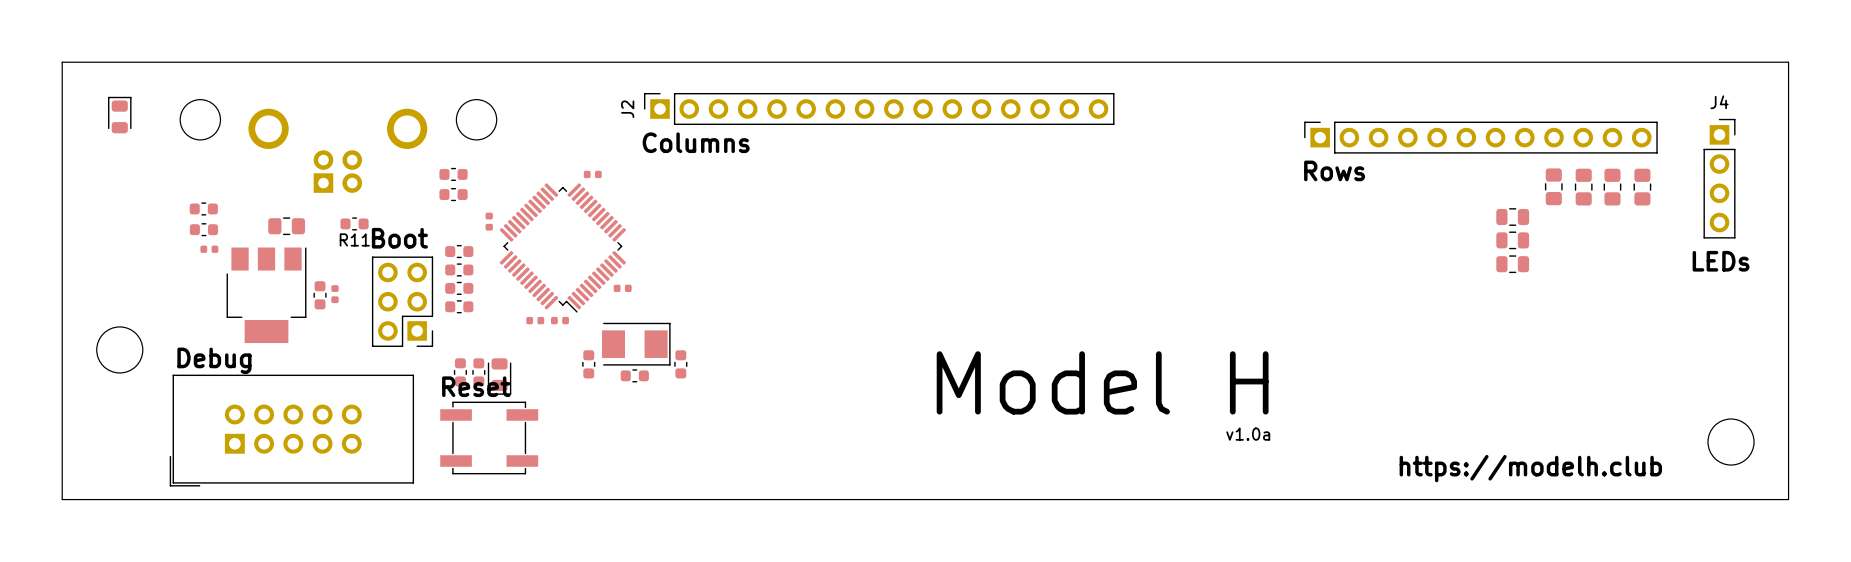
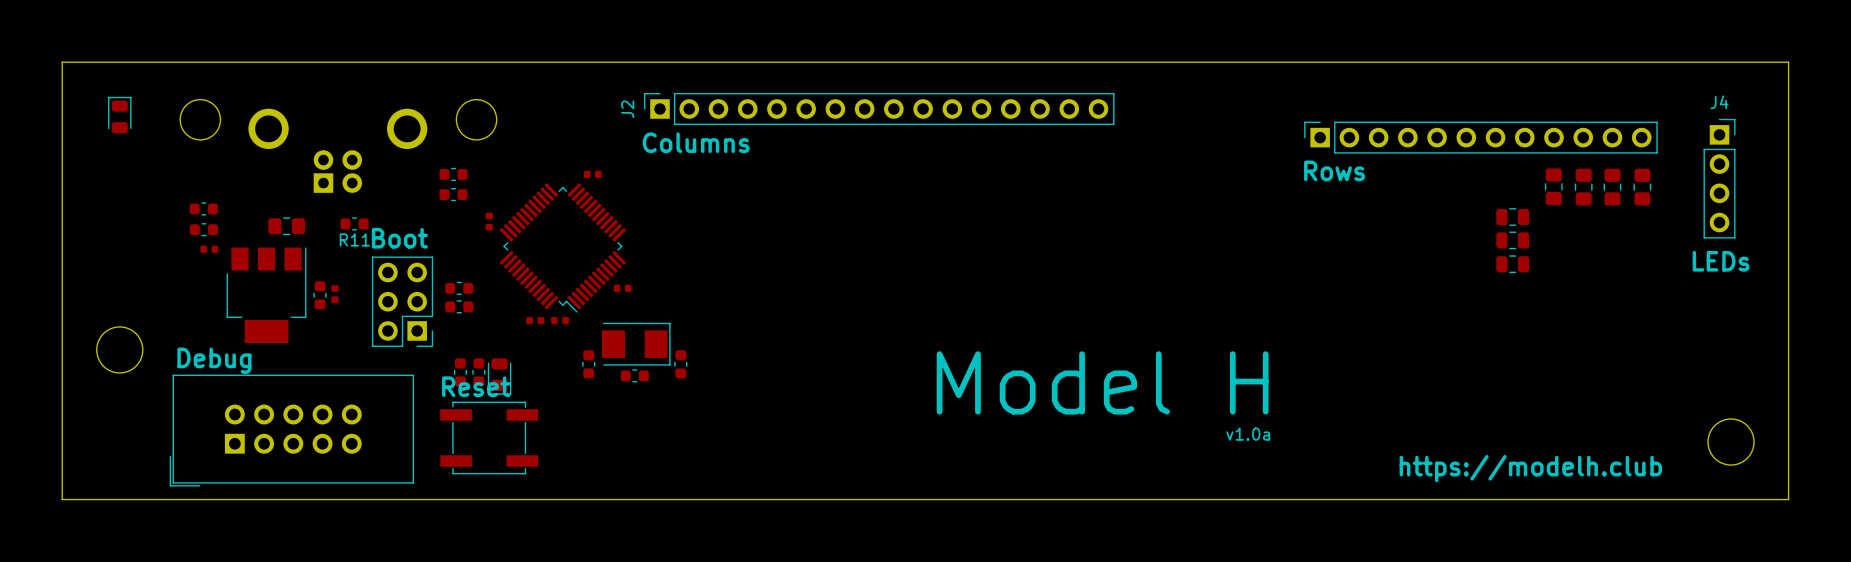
part: (459, 251) -> none
part: (459, 269) -> none

